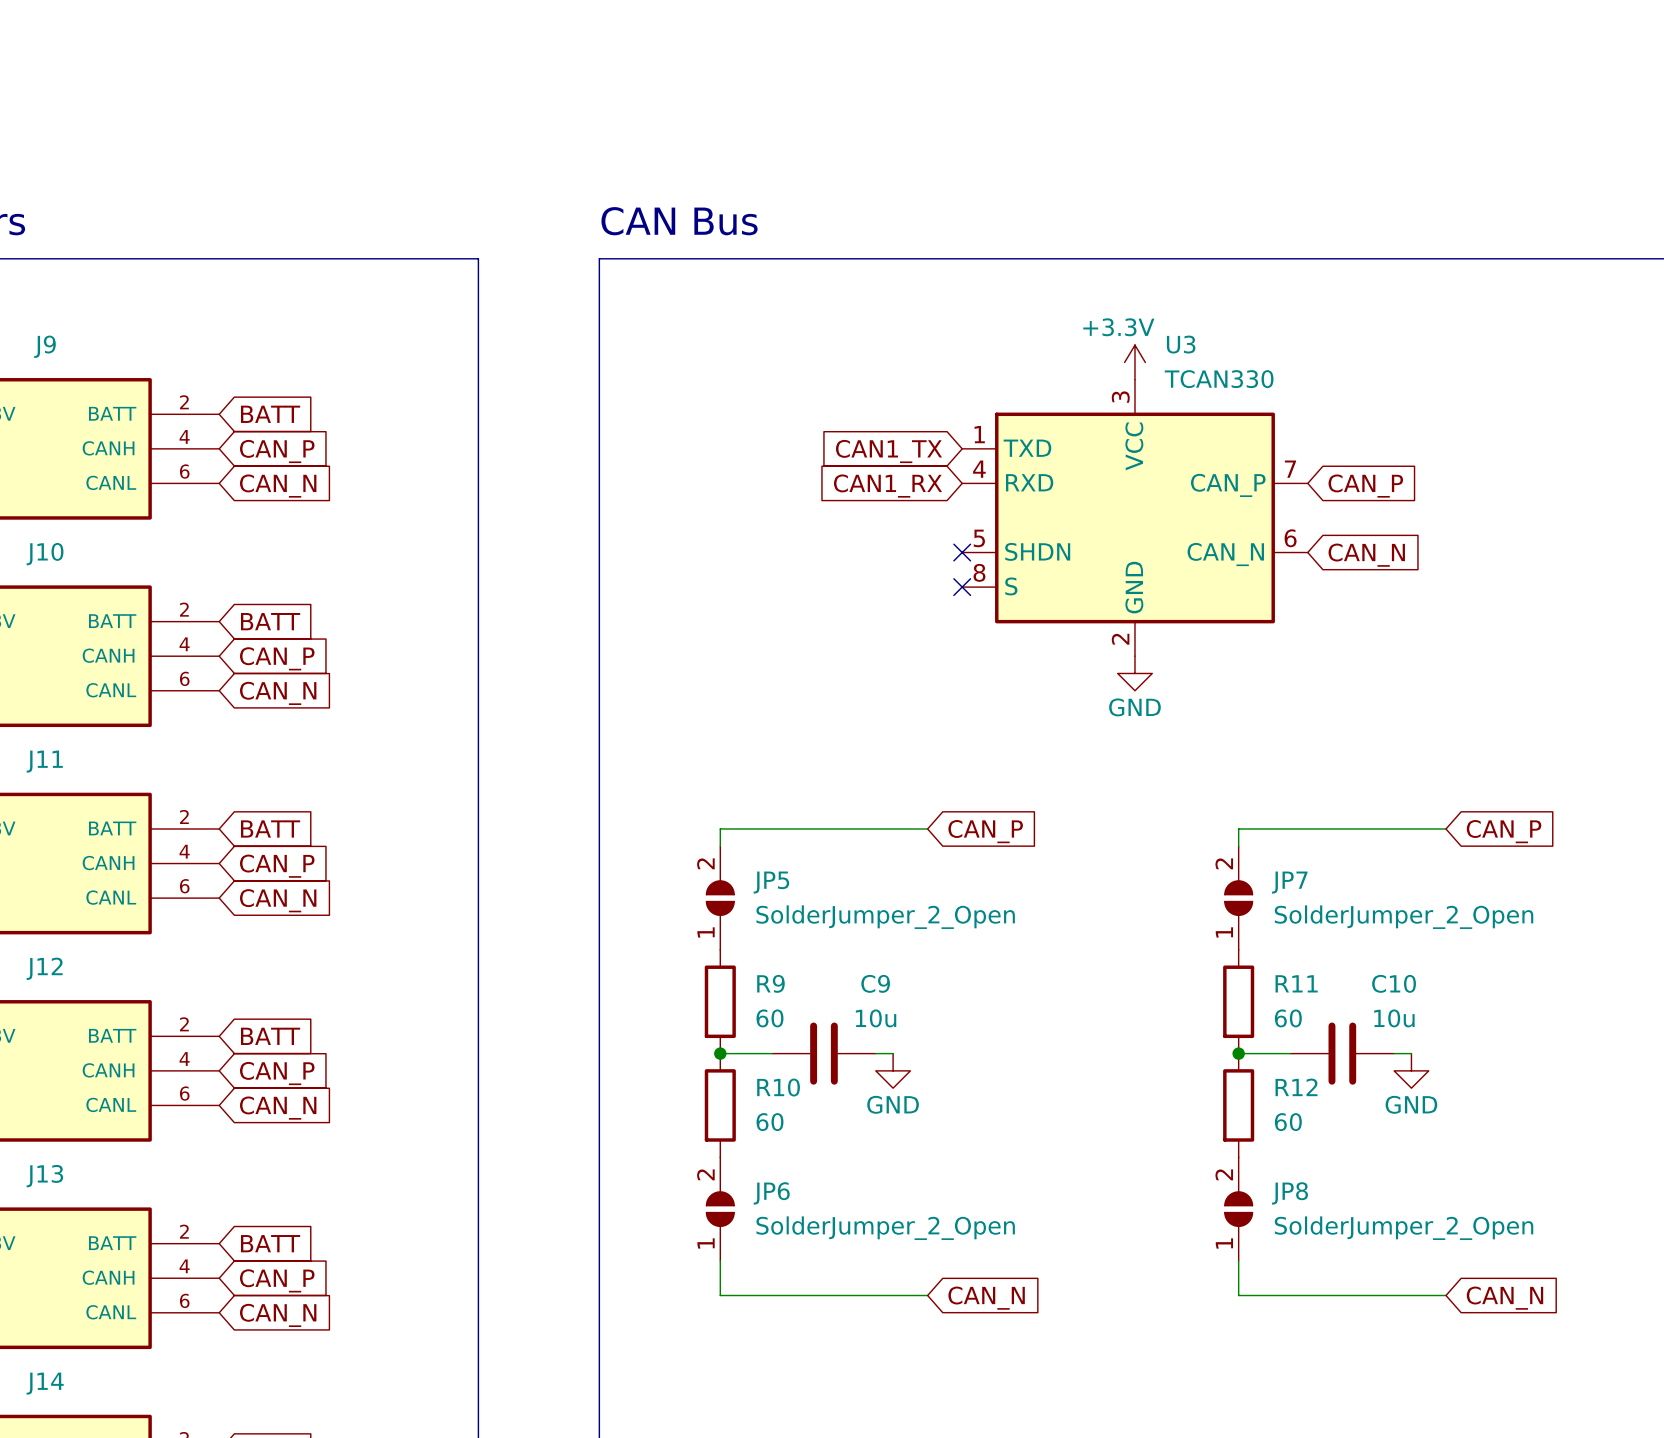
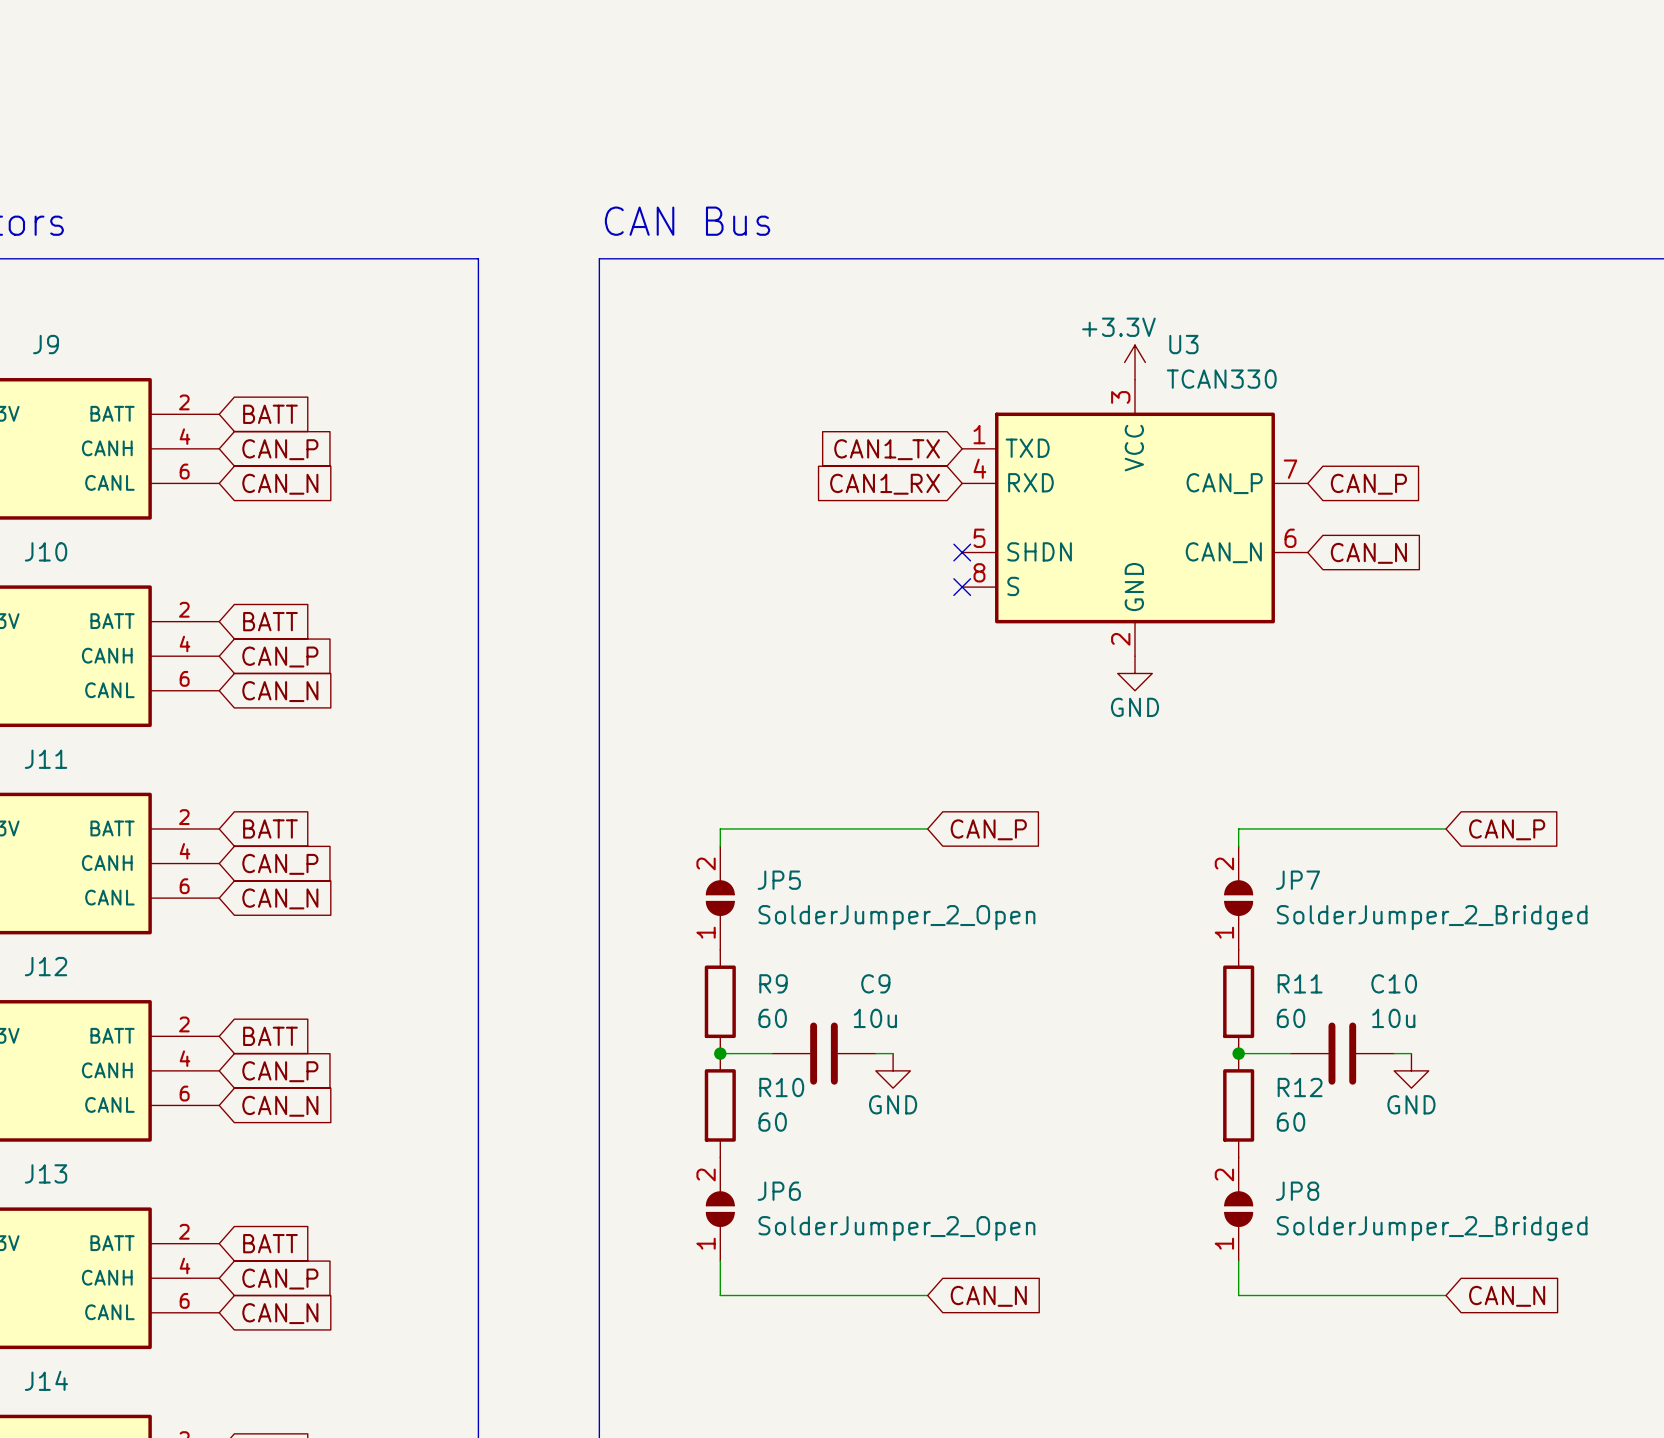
JP7 value: SolderJumper_2_Open (1404, 917) -> SolderJumper_2_Bridged (1432, 917)
JP8 value: SolderJumper_2_Open (1404, 1228) -> SolderJumper_2_Bridged (1432, 1228)

